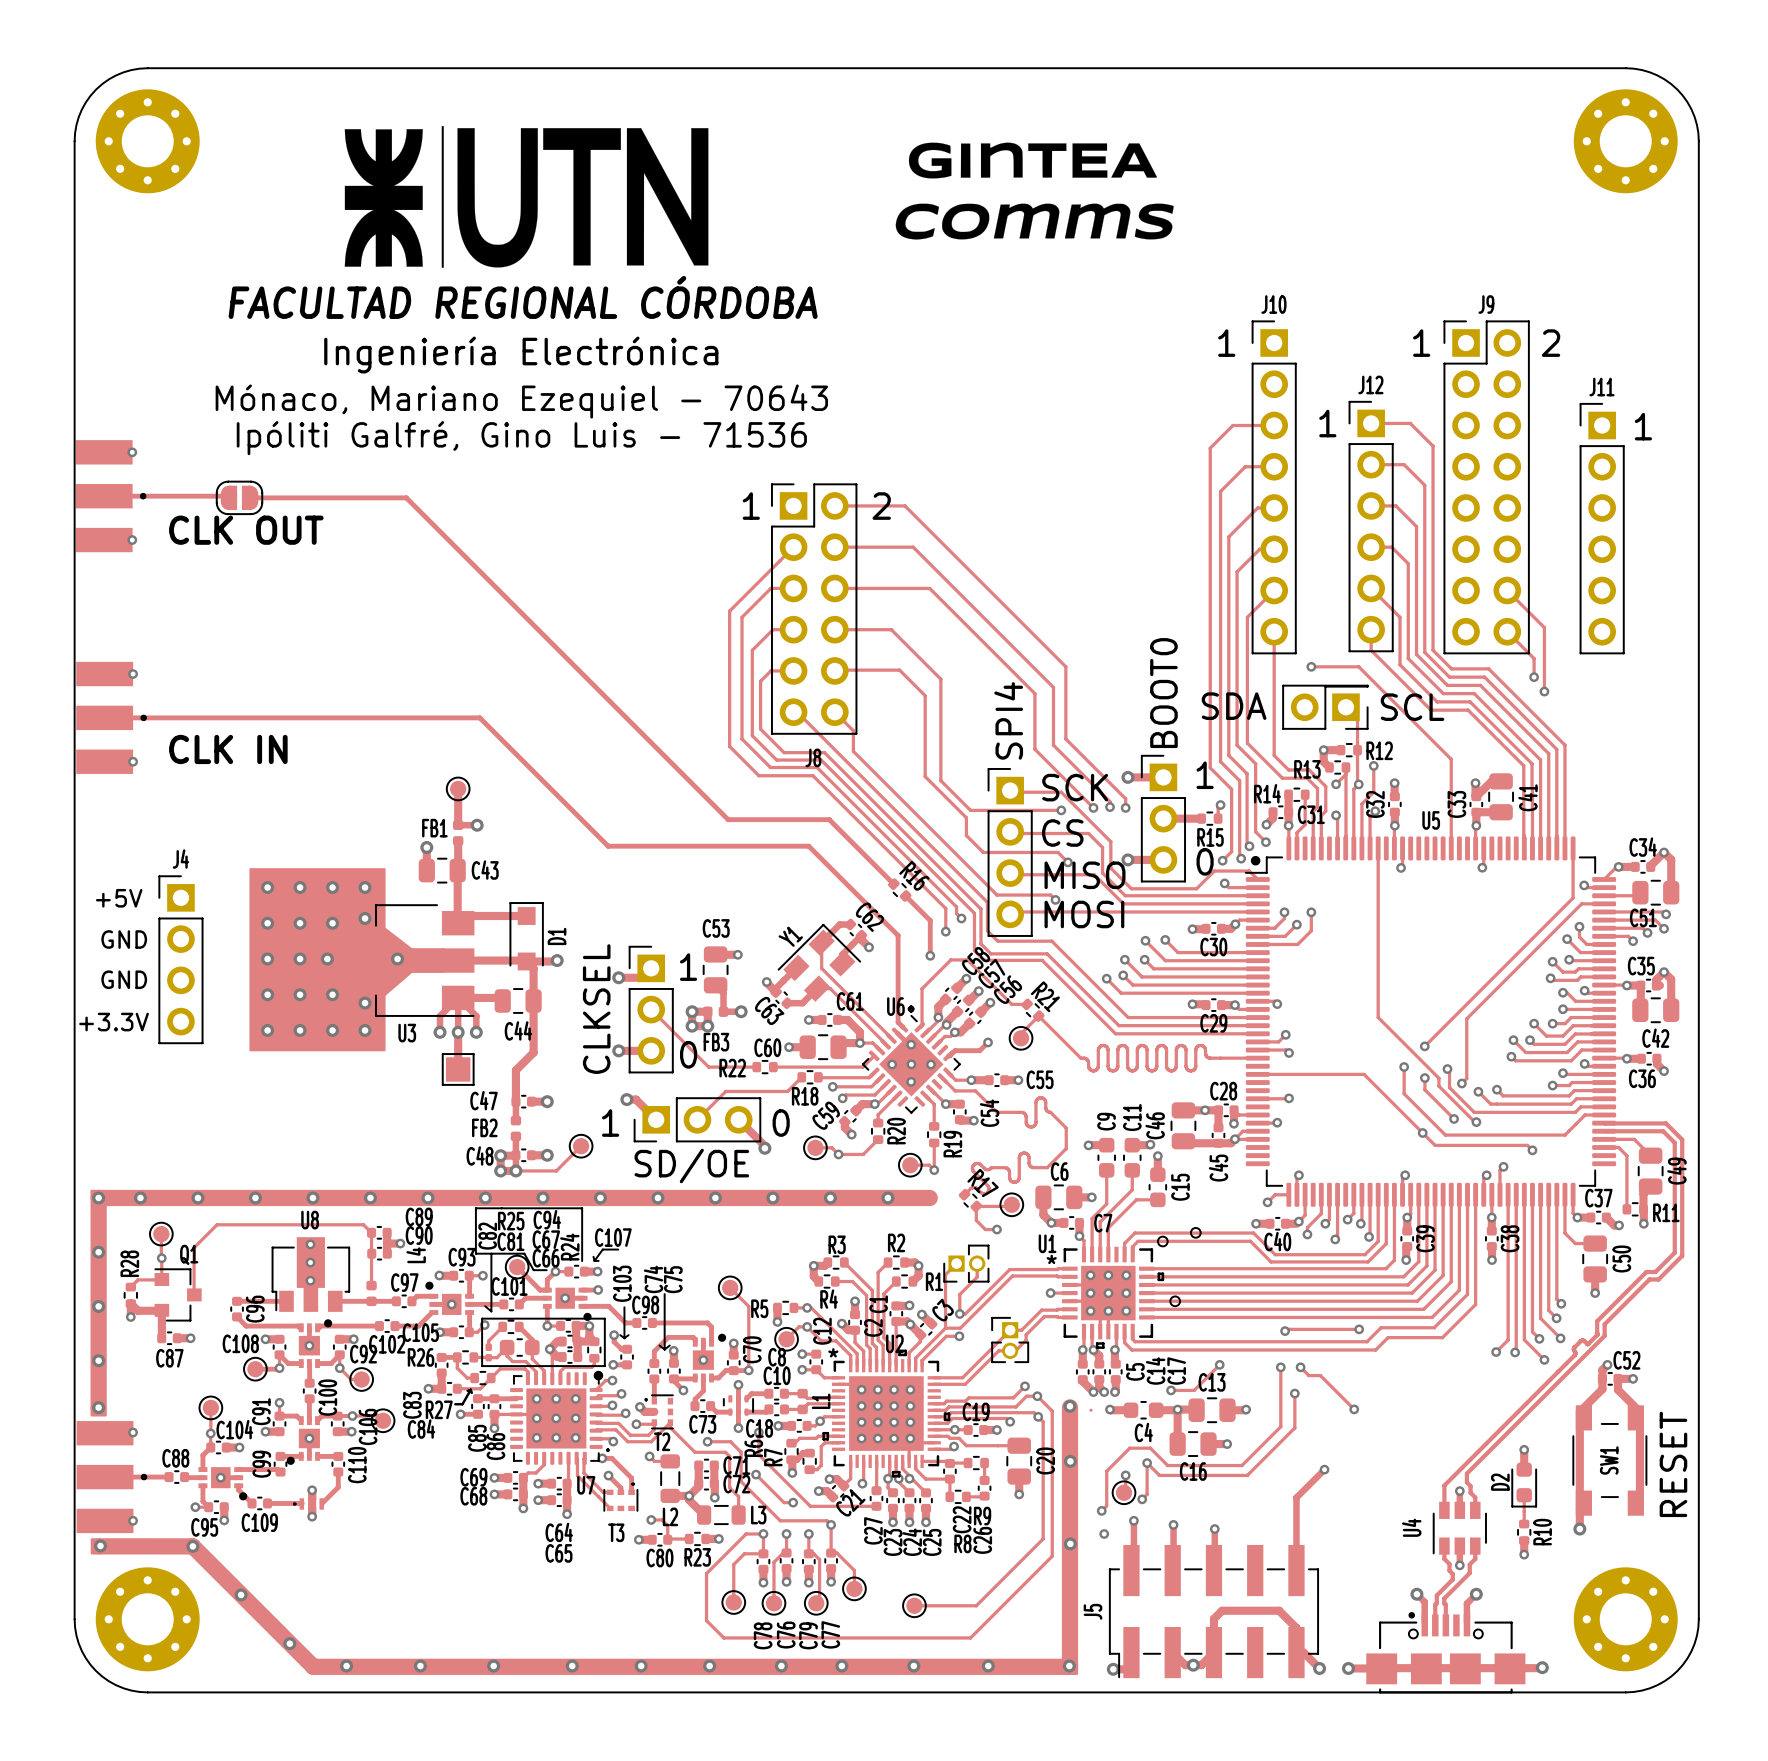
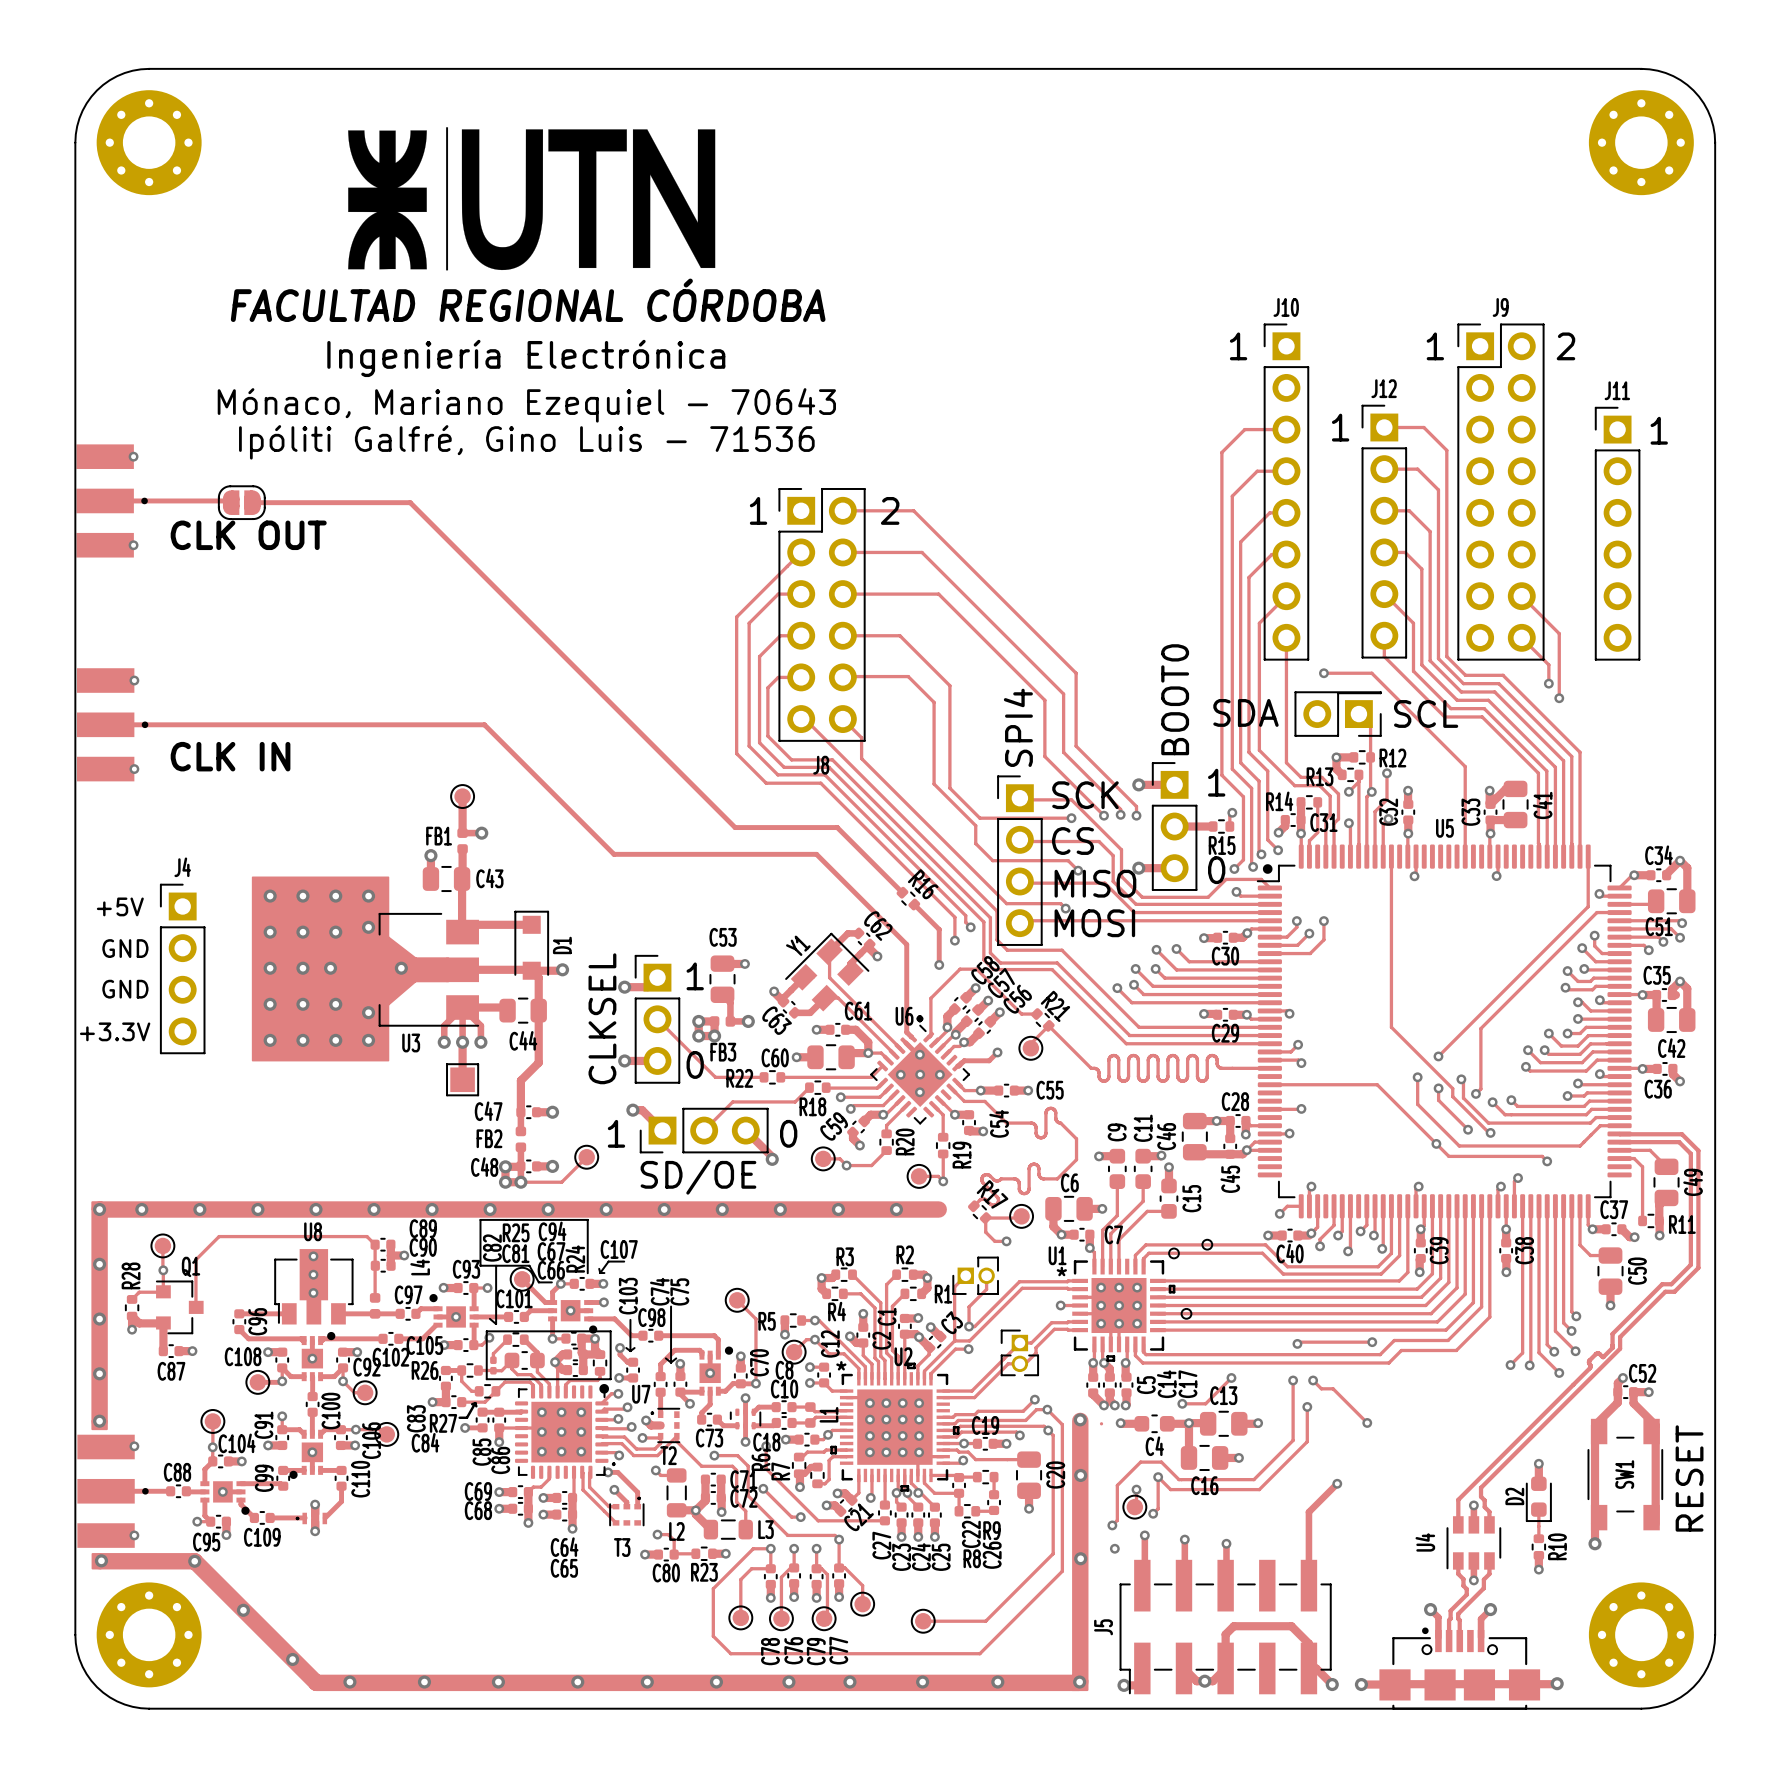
drawing: [895, 142, 1174, 240] -> none
U7 name position: U7 (586, 1485) -> U7 (641, 1394)

